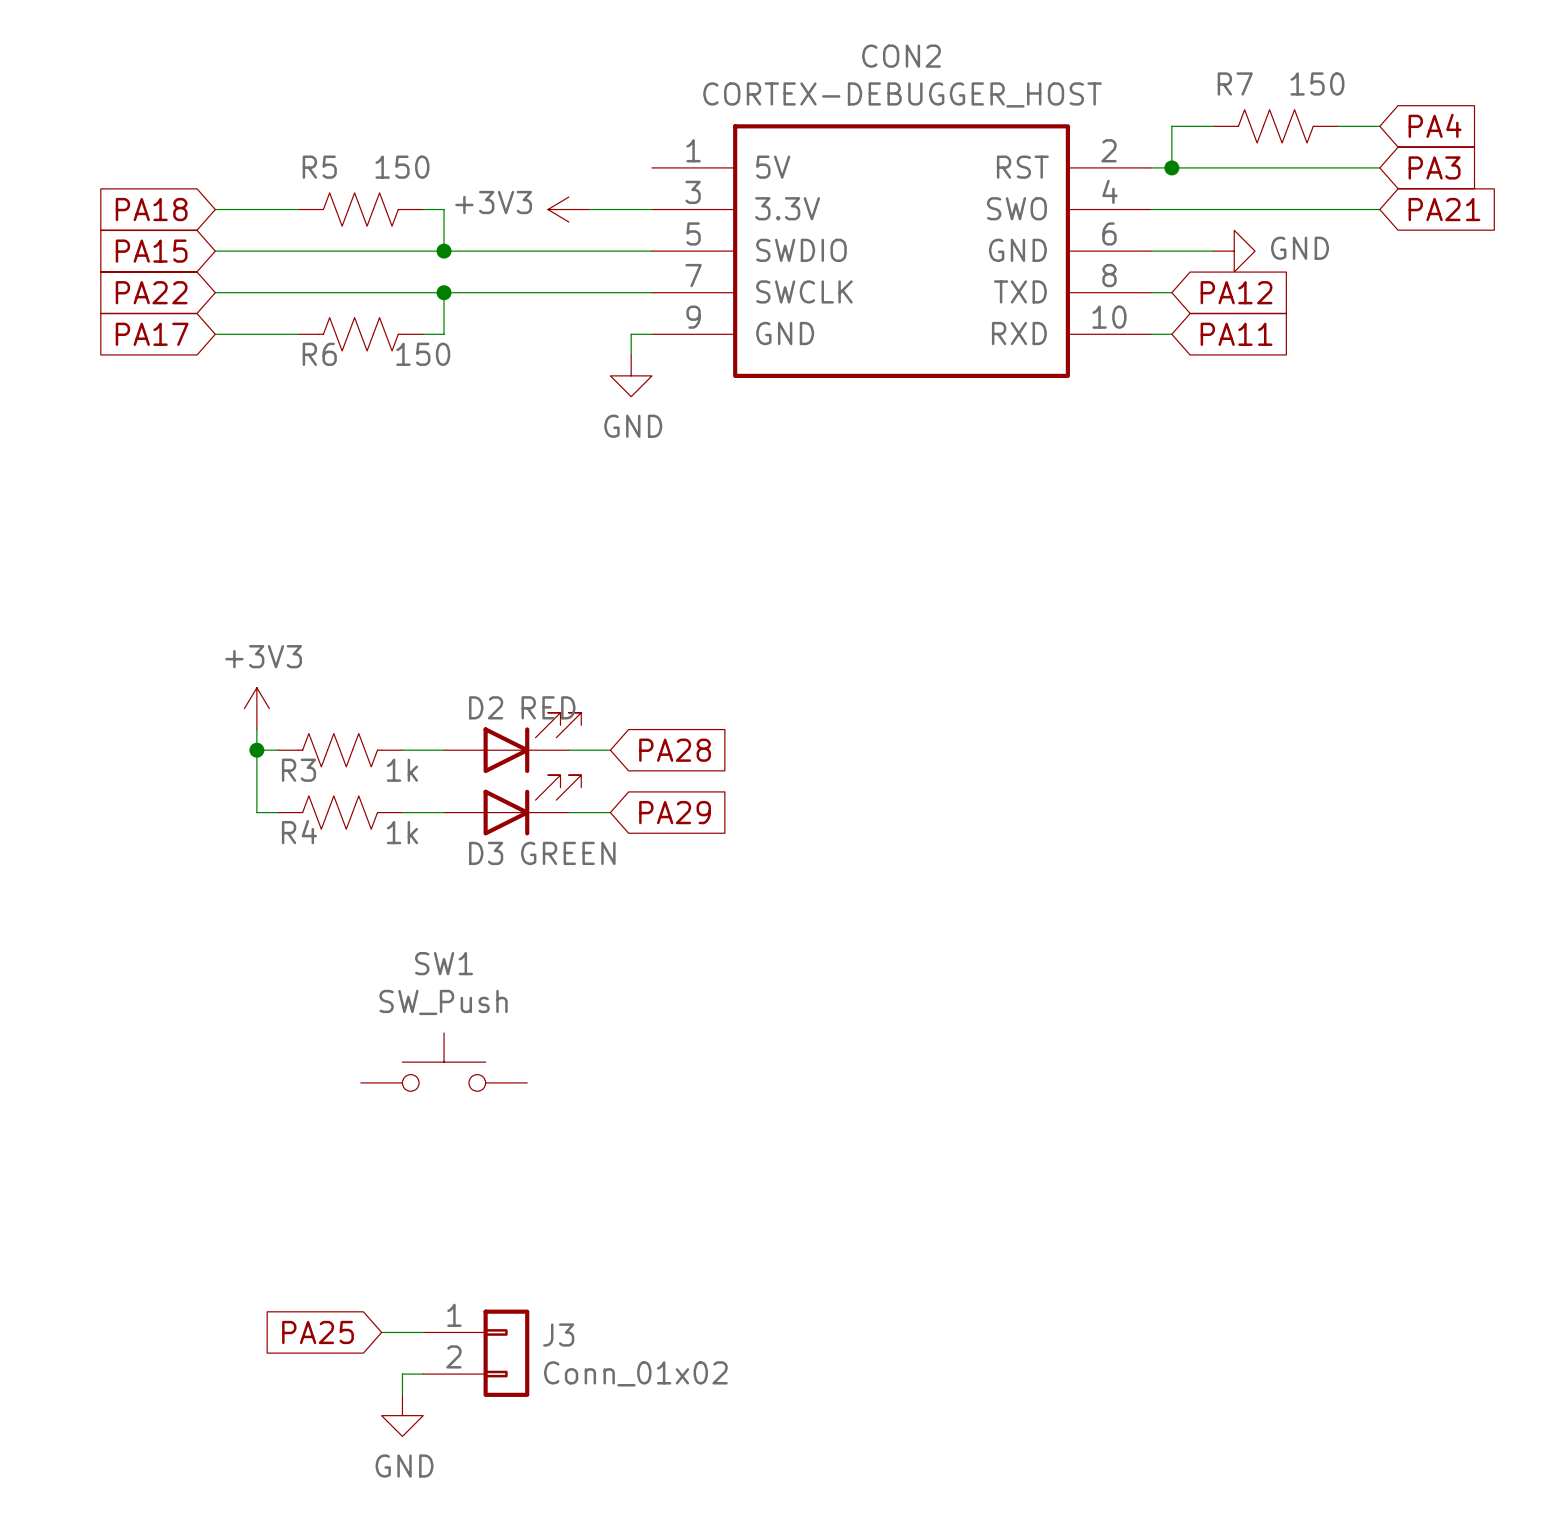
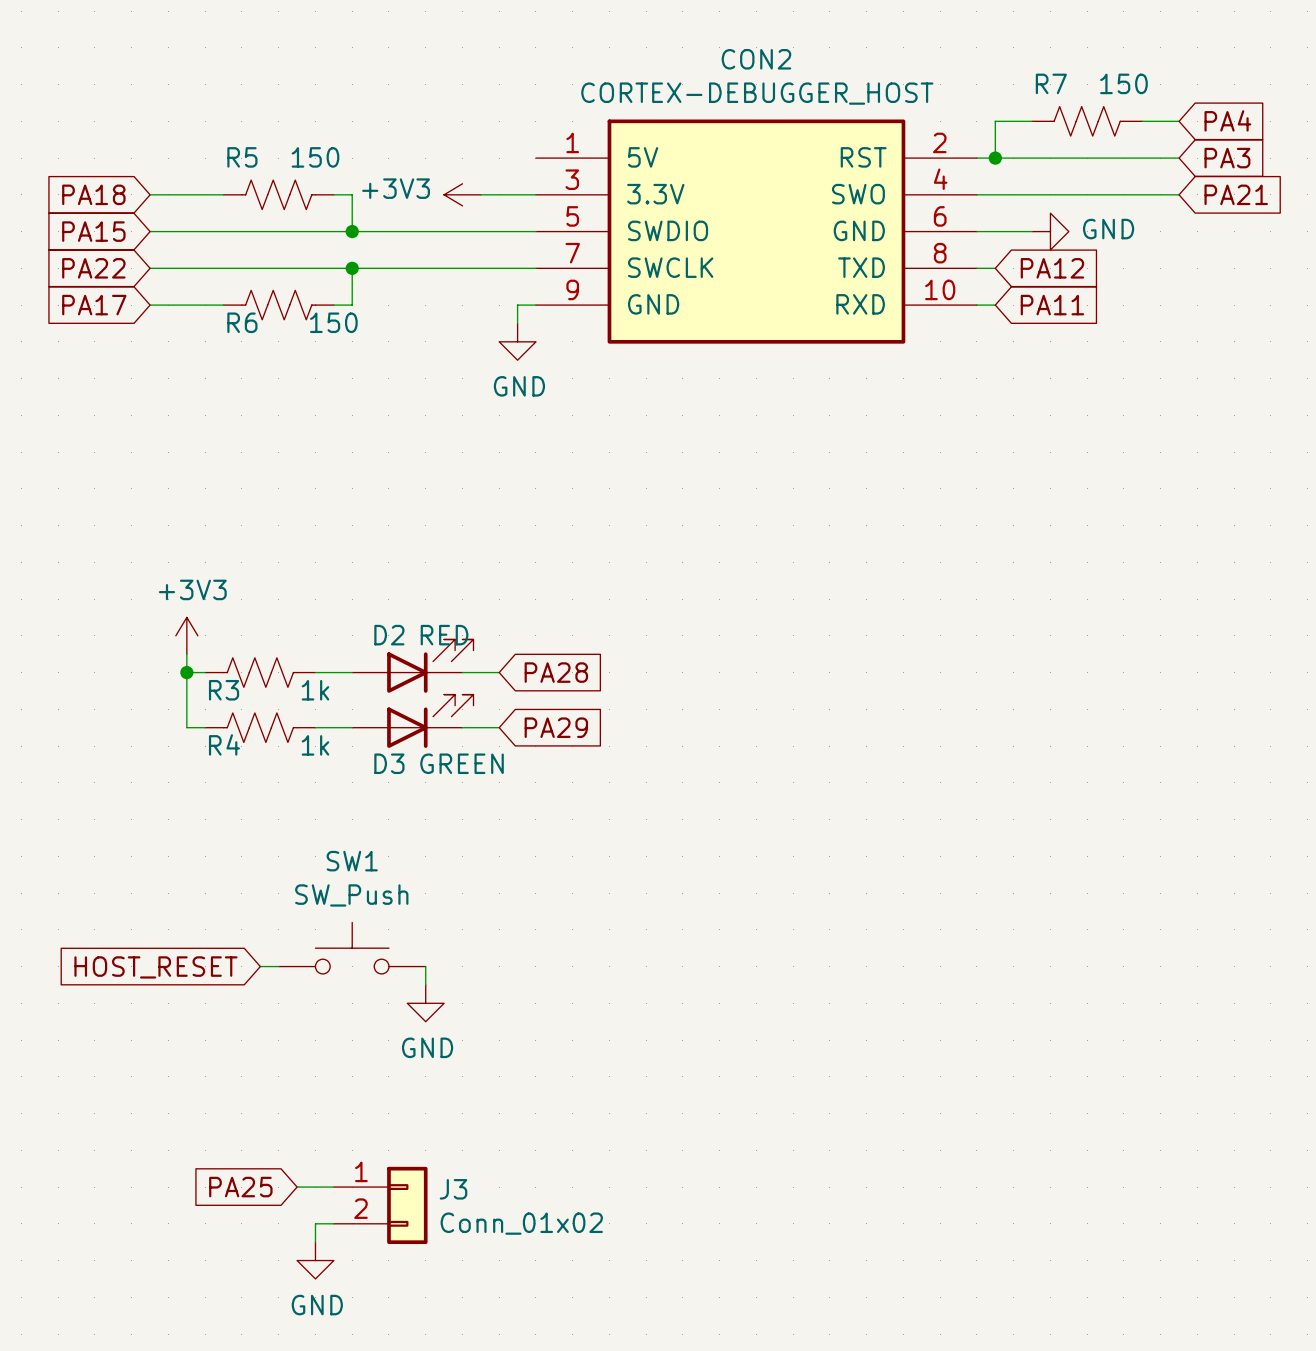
wire: none -> (260, 966) (278, 966)
wire: none -> (425, 966) (425, 984)
global label: none -> HOST_RESET (155, 967)
power symbol: none -> GND (425, 1003)

